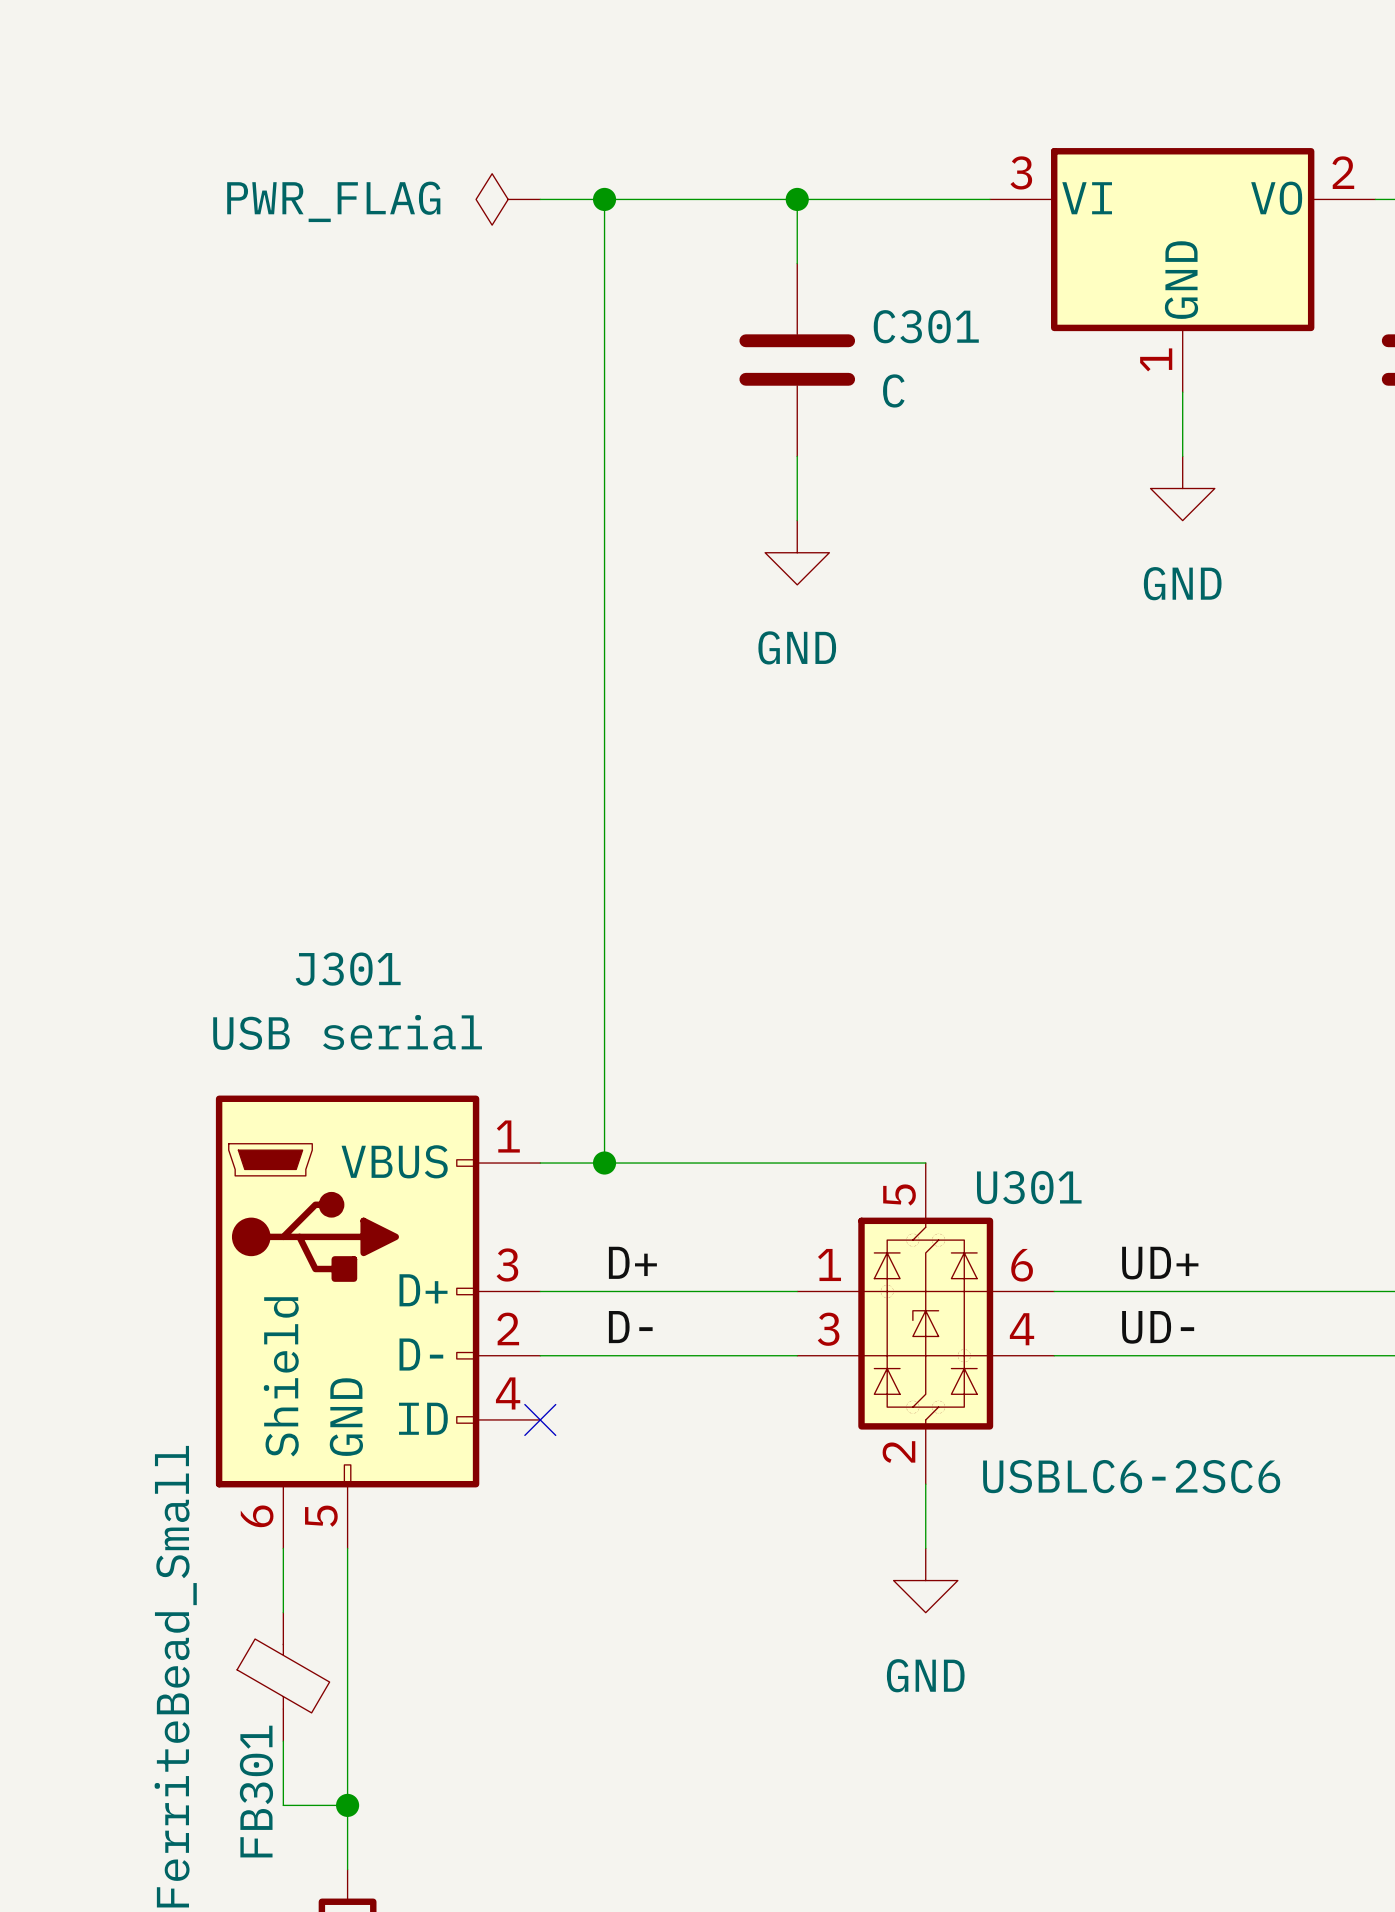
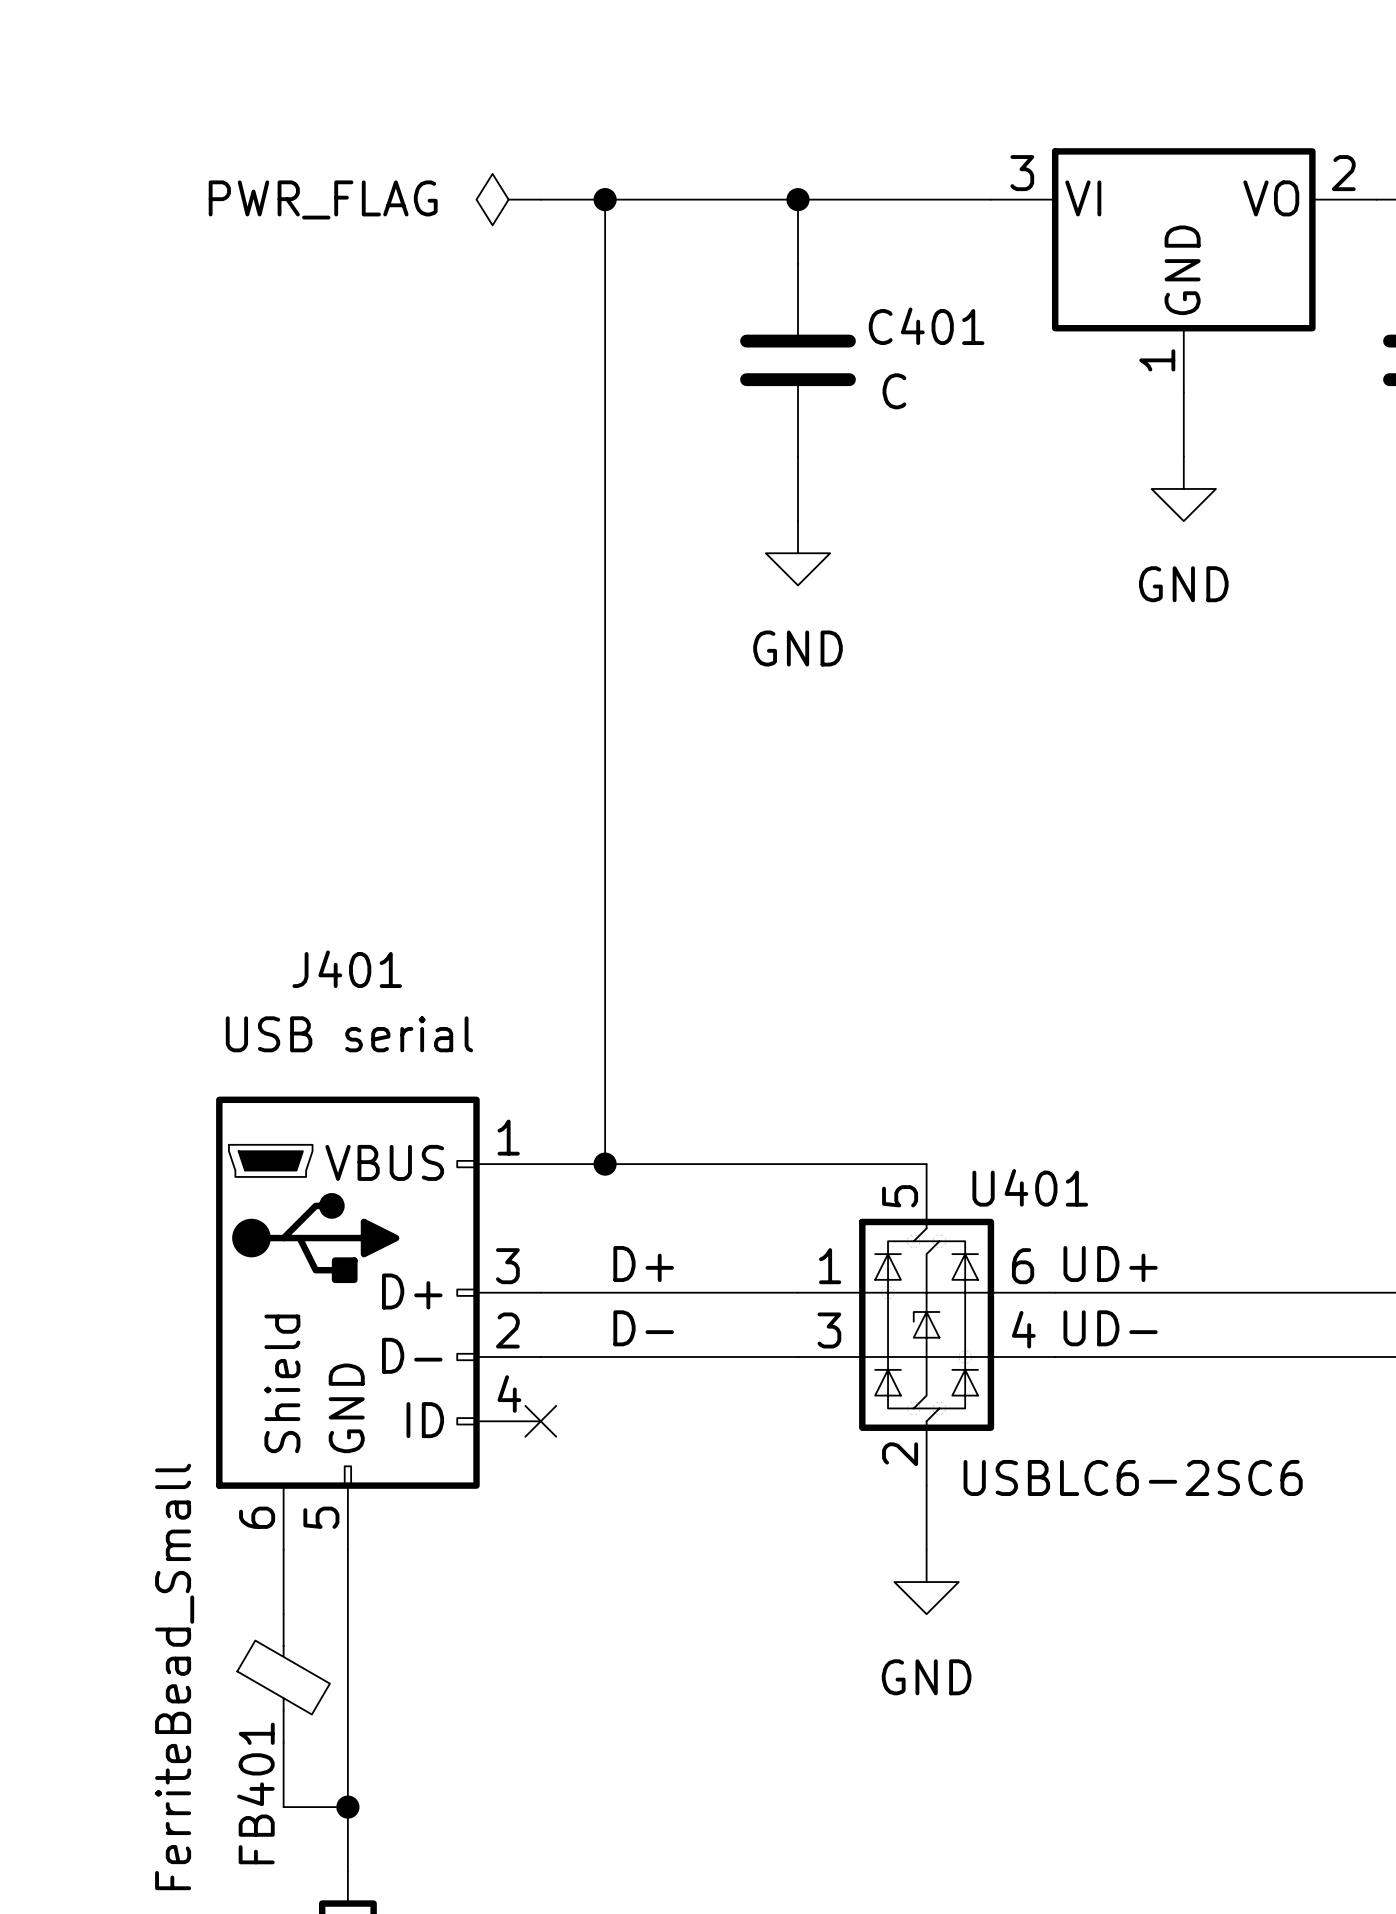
C301 name: C301 (926, 326) -> C401 (926, 326)
J301 name: J301 (348, 969) -> J401 (347, 969)
U301 name: U301 (1029, 1187) -> U401 (1030, 1187)
label position: UD+ (1160, 1263) -> UD+ (1110, 1264)
label position: UD- (1158, 1327) -> UD- (1110, 1328)
FB301 name: FB301 (256, 1791) -> FB401 (255, 1793)

